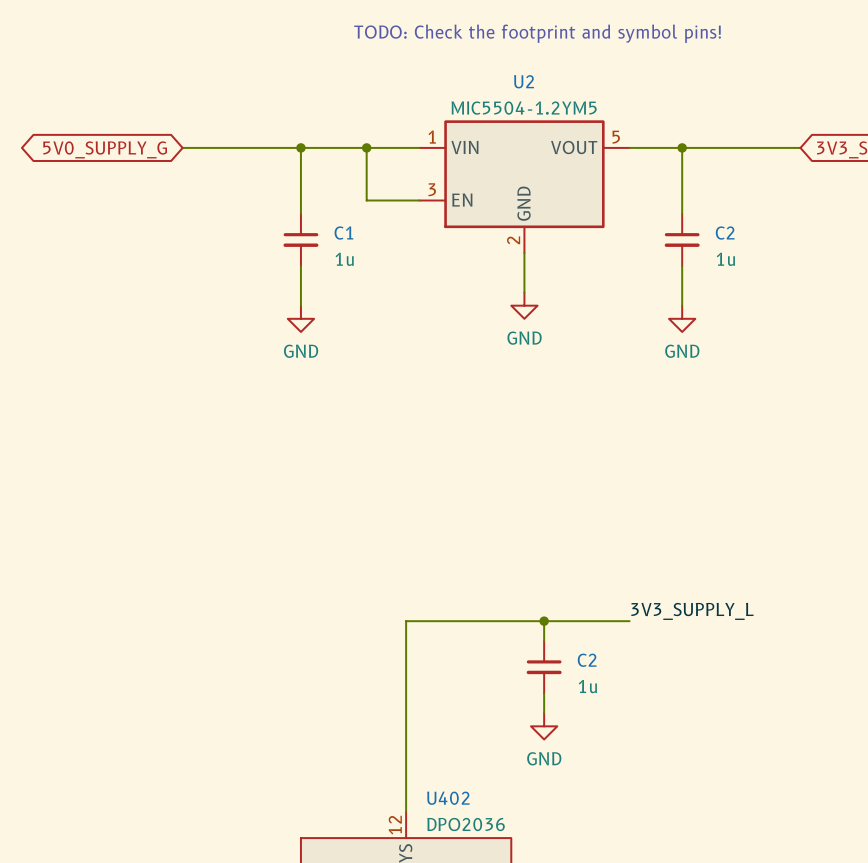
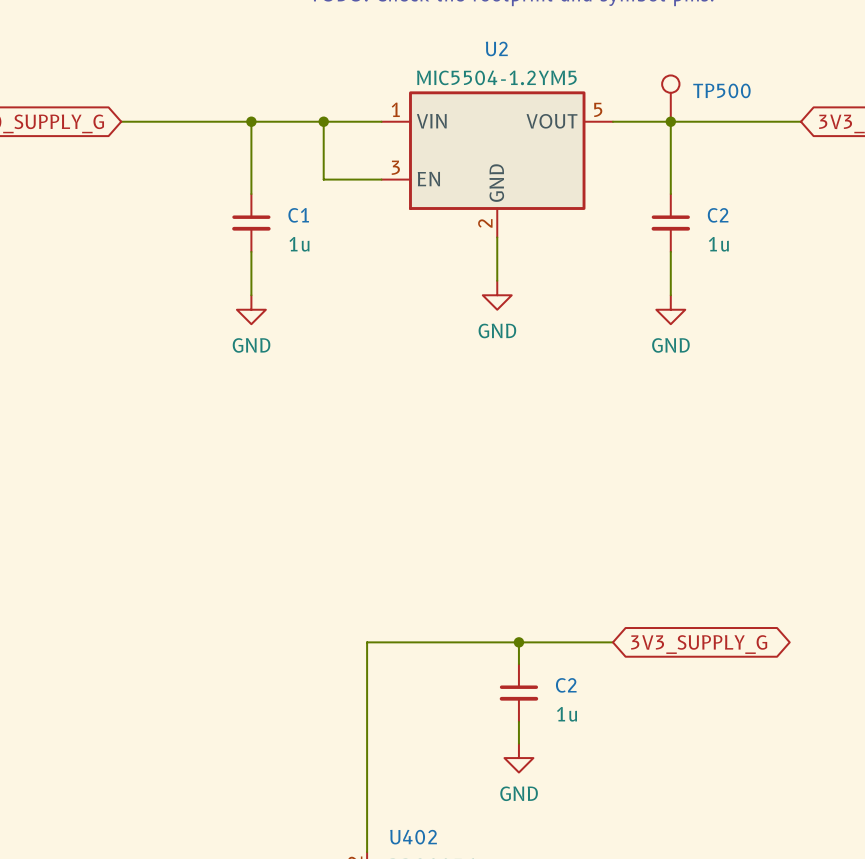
TP500: none -> (670, 98)
label: 3V3_SUPPLY_L (692, 611) -> none
global label: none -> 3V3_SUPPLY_G (699, 644)

